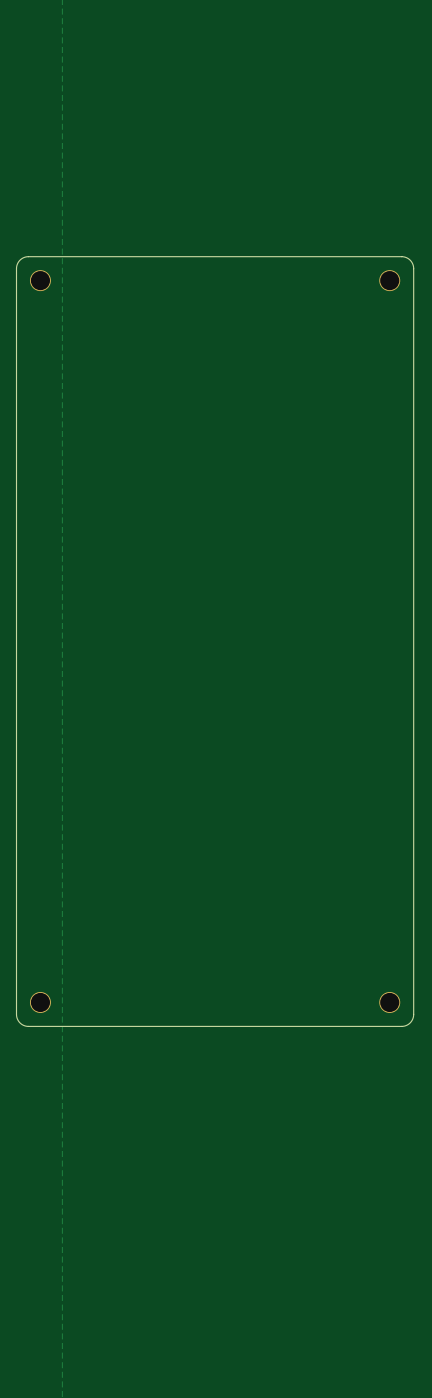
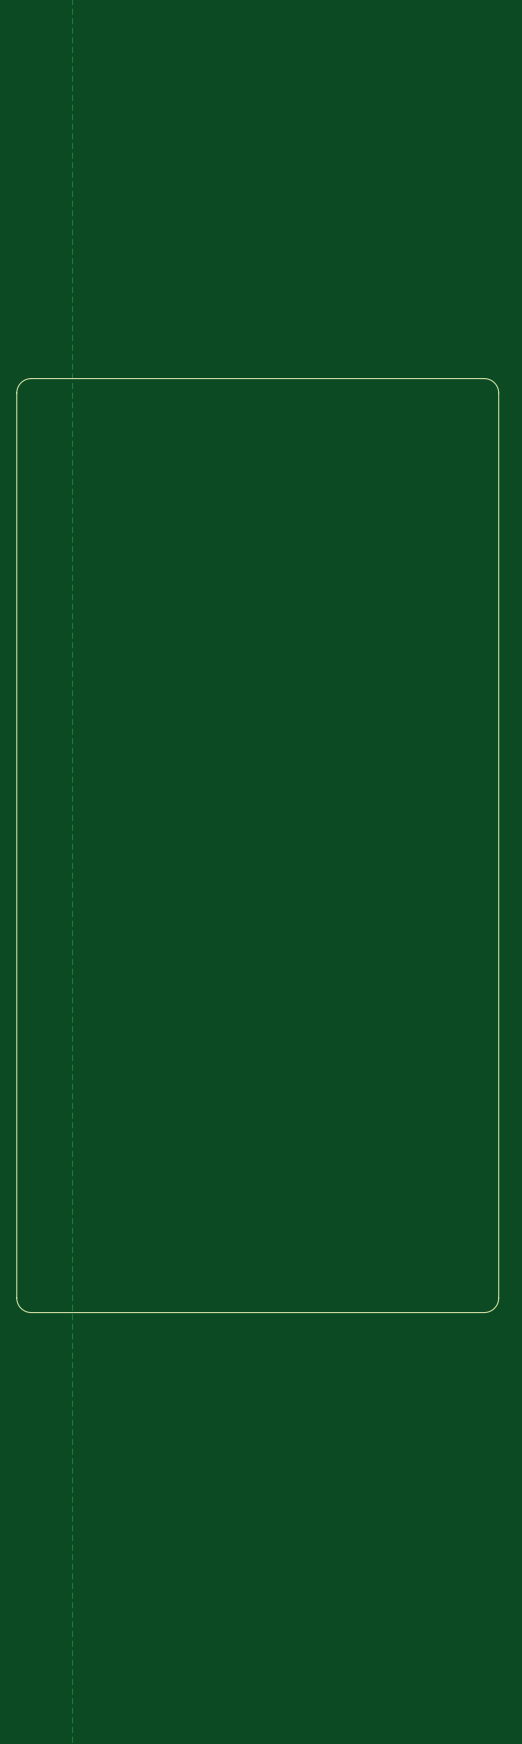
part: (40, 280) -> none
part: (389, 280) -> none
part: (40, 1002) -> none
part: (389, 1002) -> none

